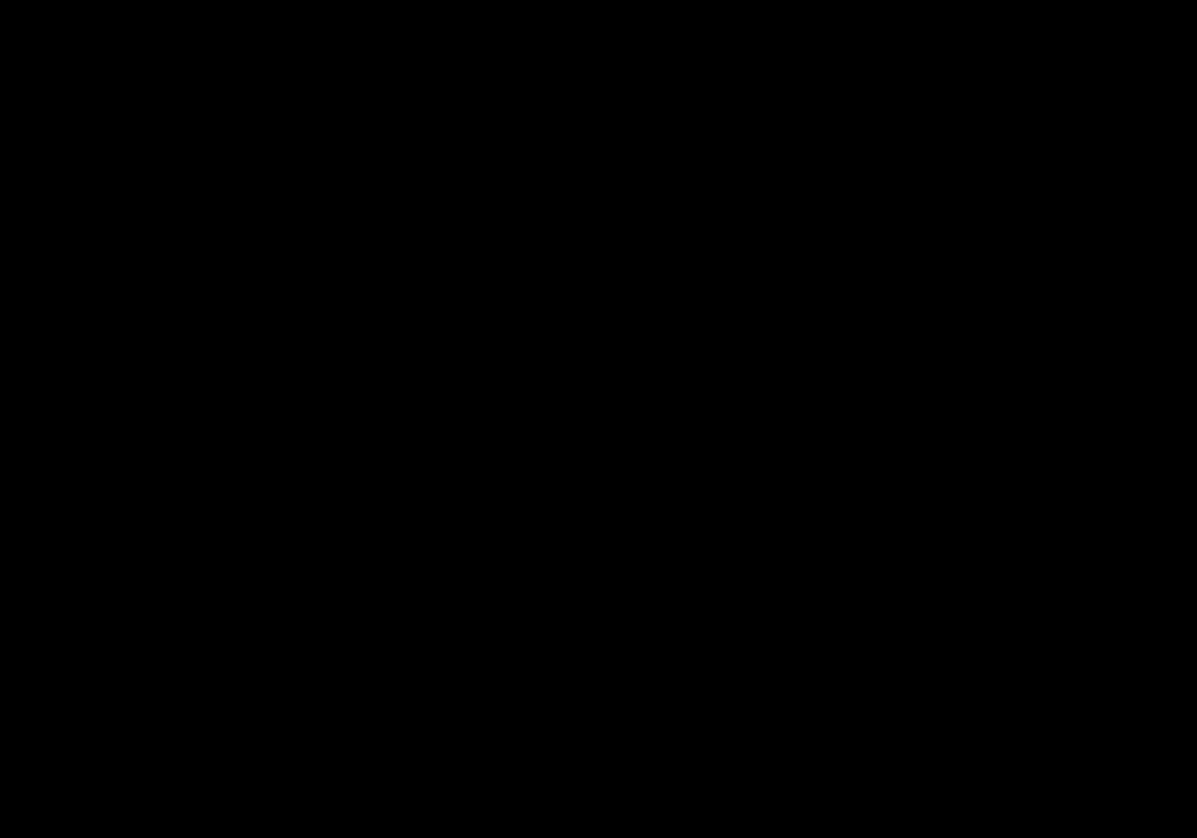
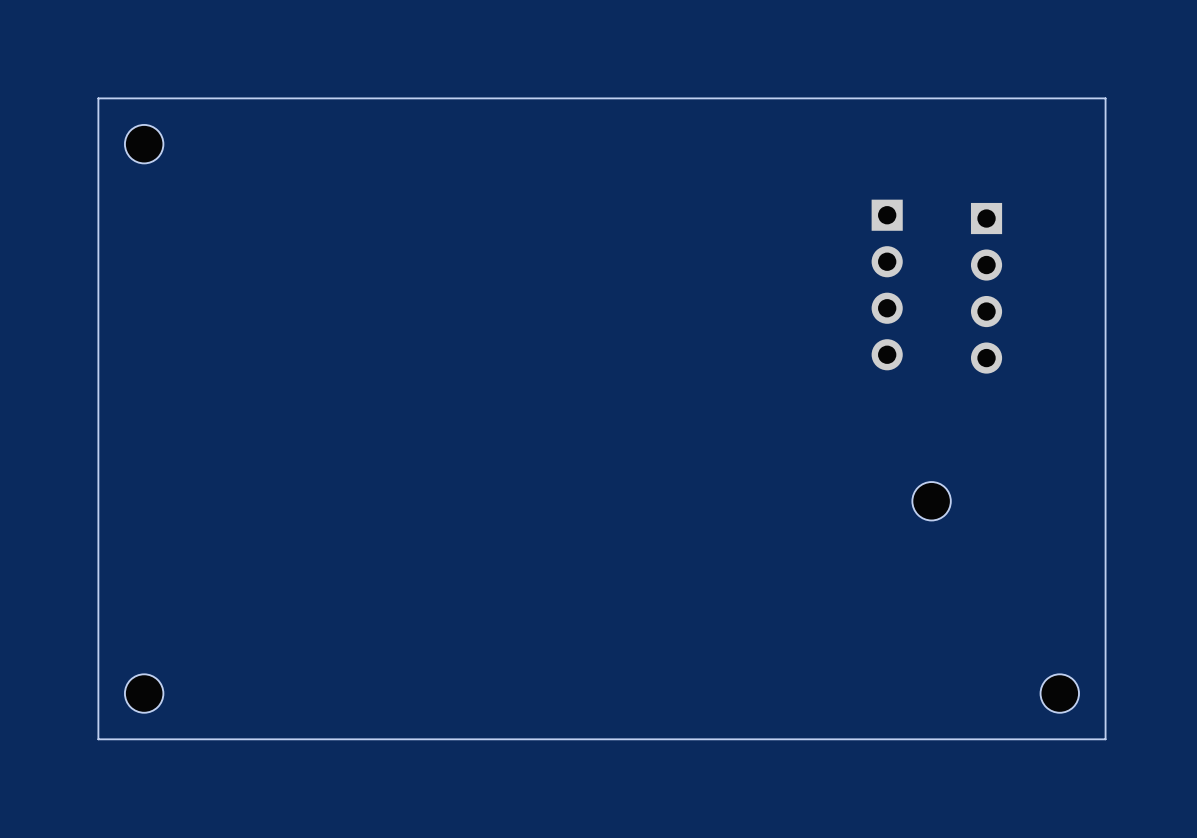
board edge: none -> (1105, 98) (98, 98) (98, 739) (1105, 739) (1105, 98)
part: none -> (144, 144)
part: none -> (887, 284)
part: none -> (986, 288)
part: none -> (931, 501)
part: none -> (144, 693)
part: none -> (1059, 693)

